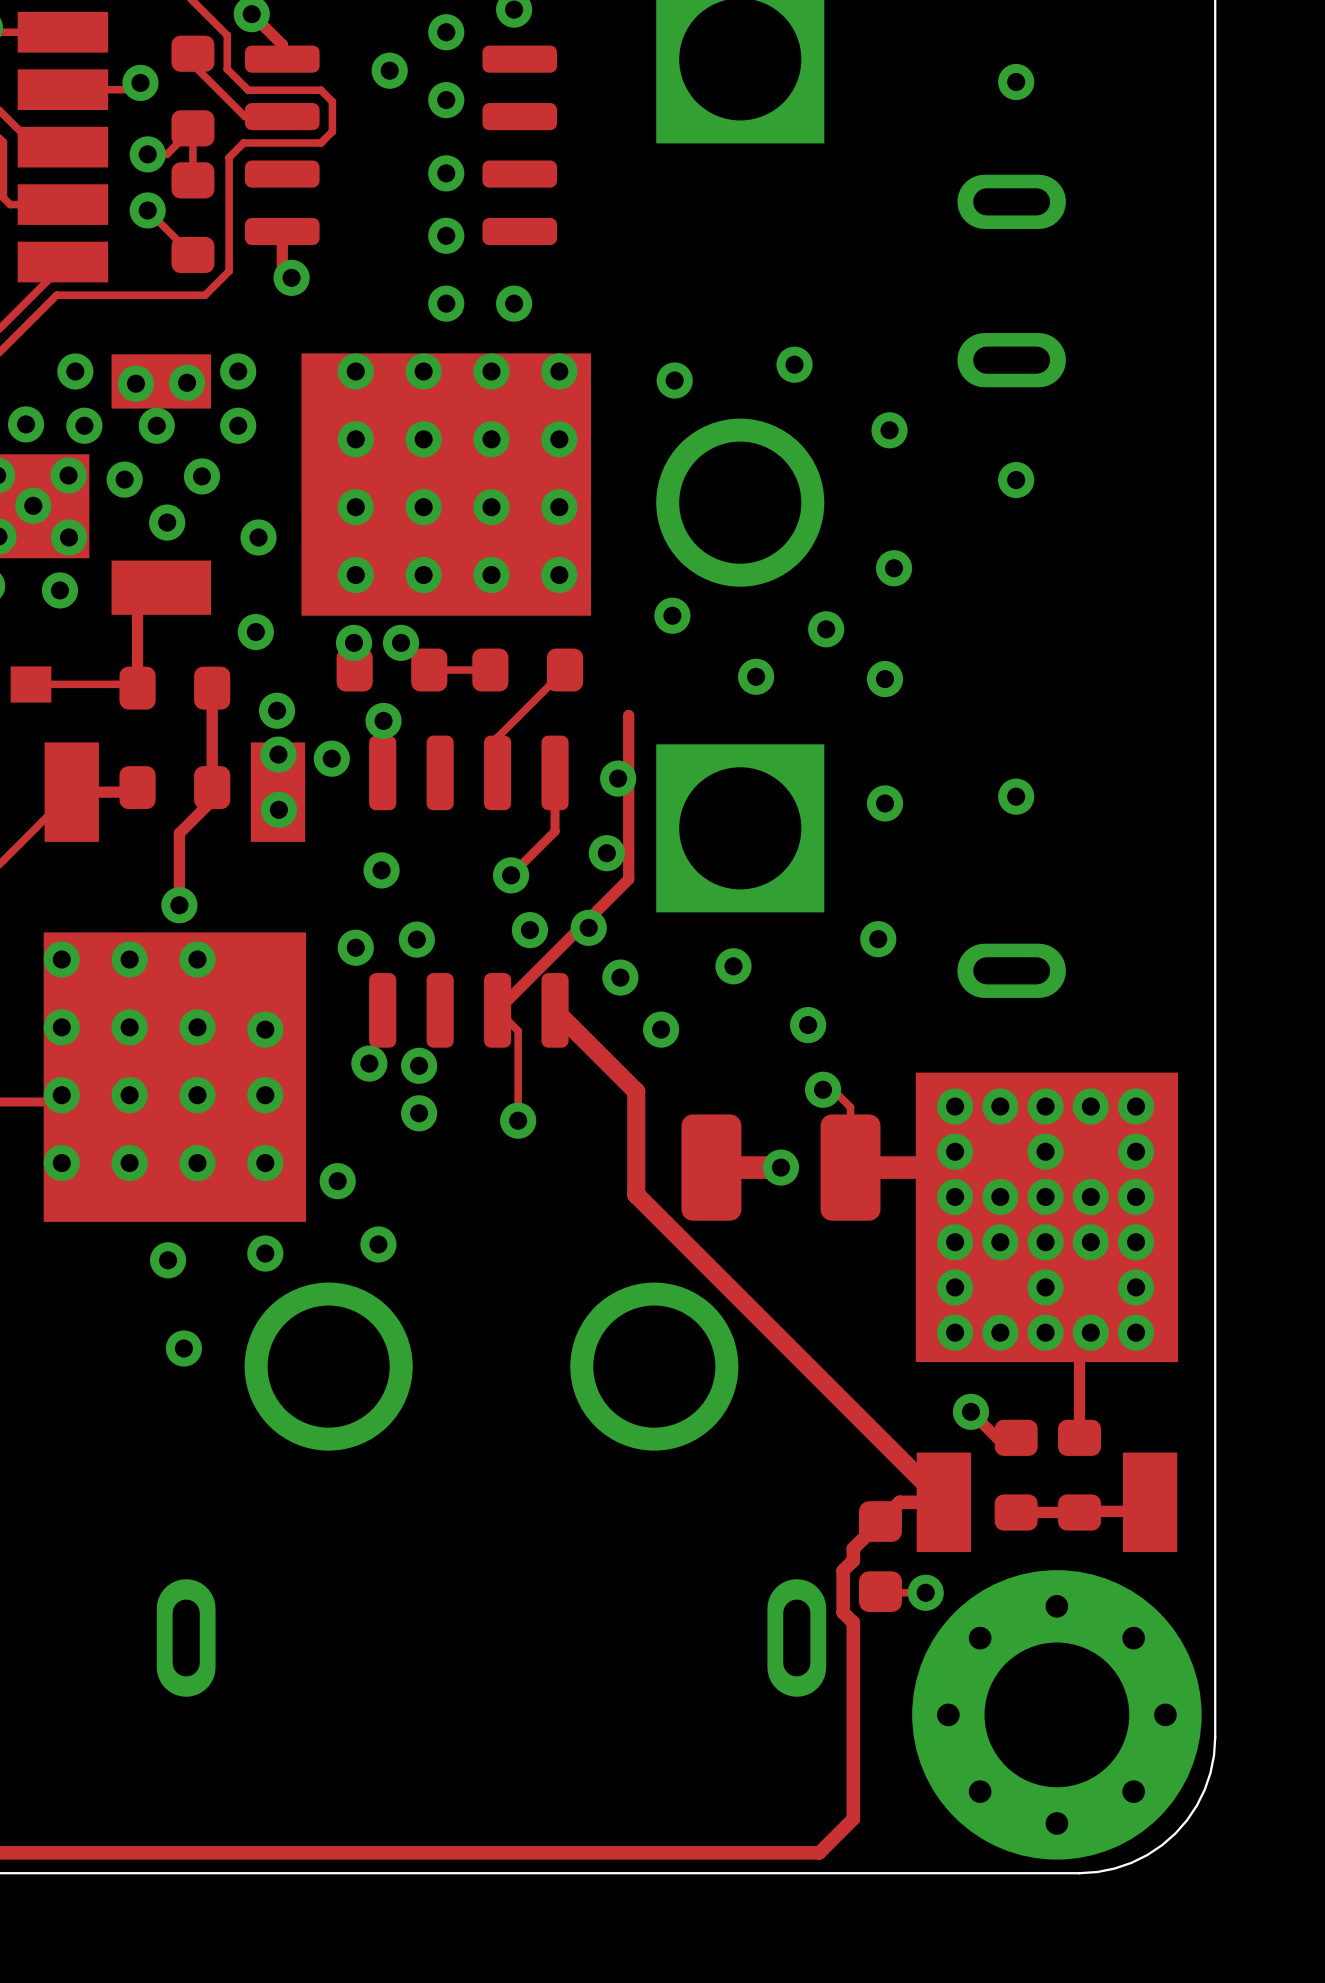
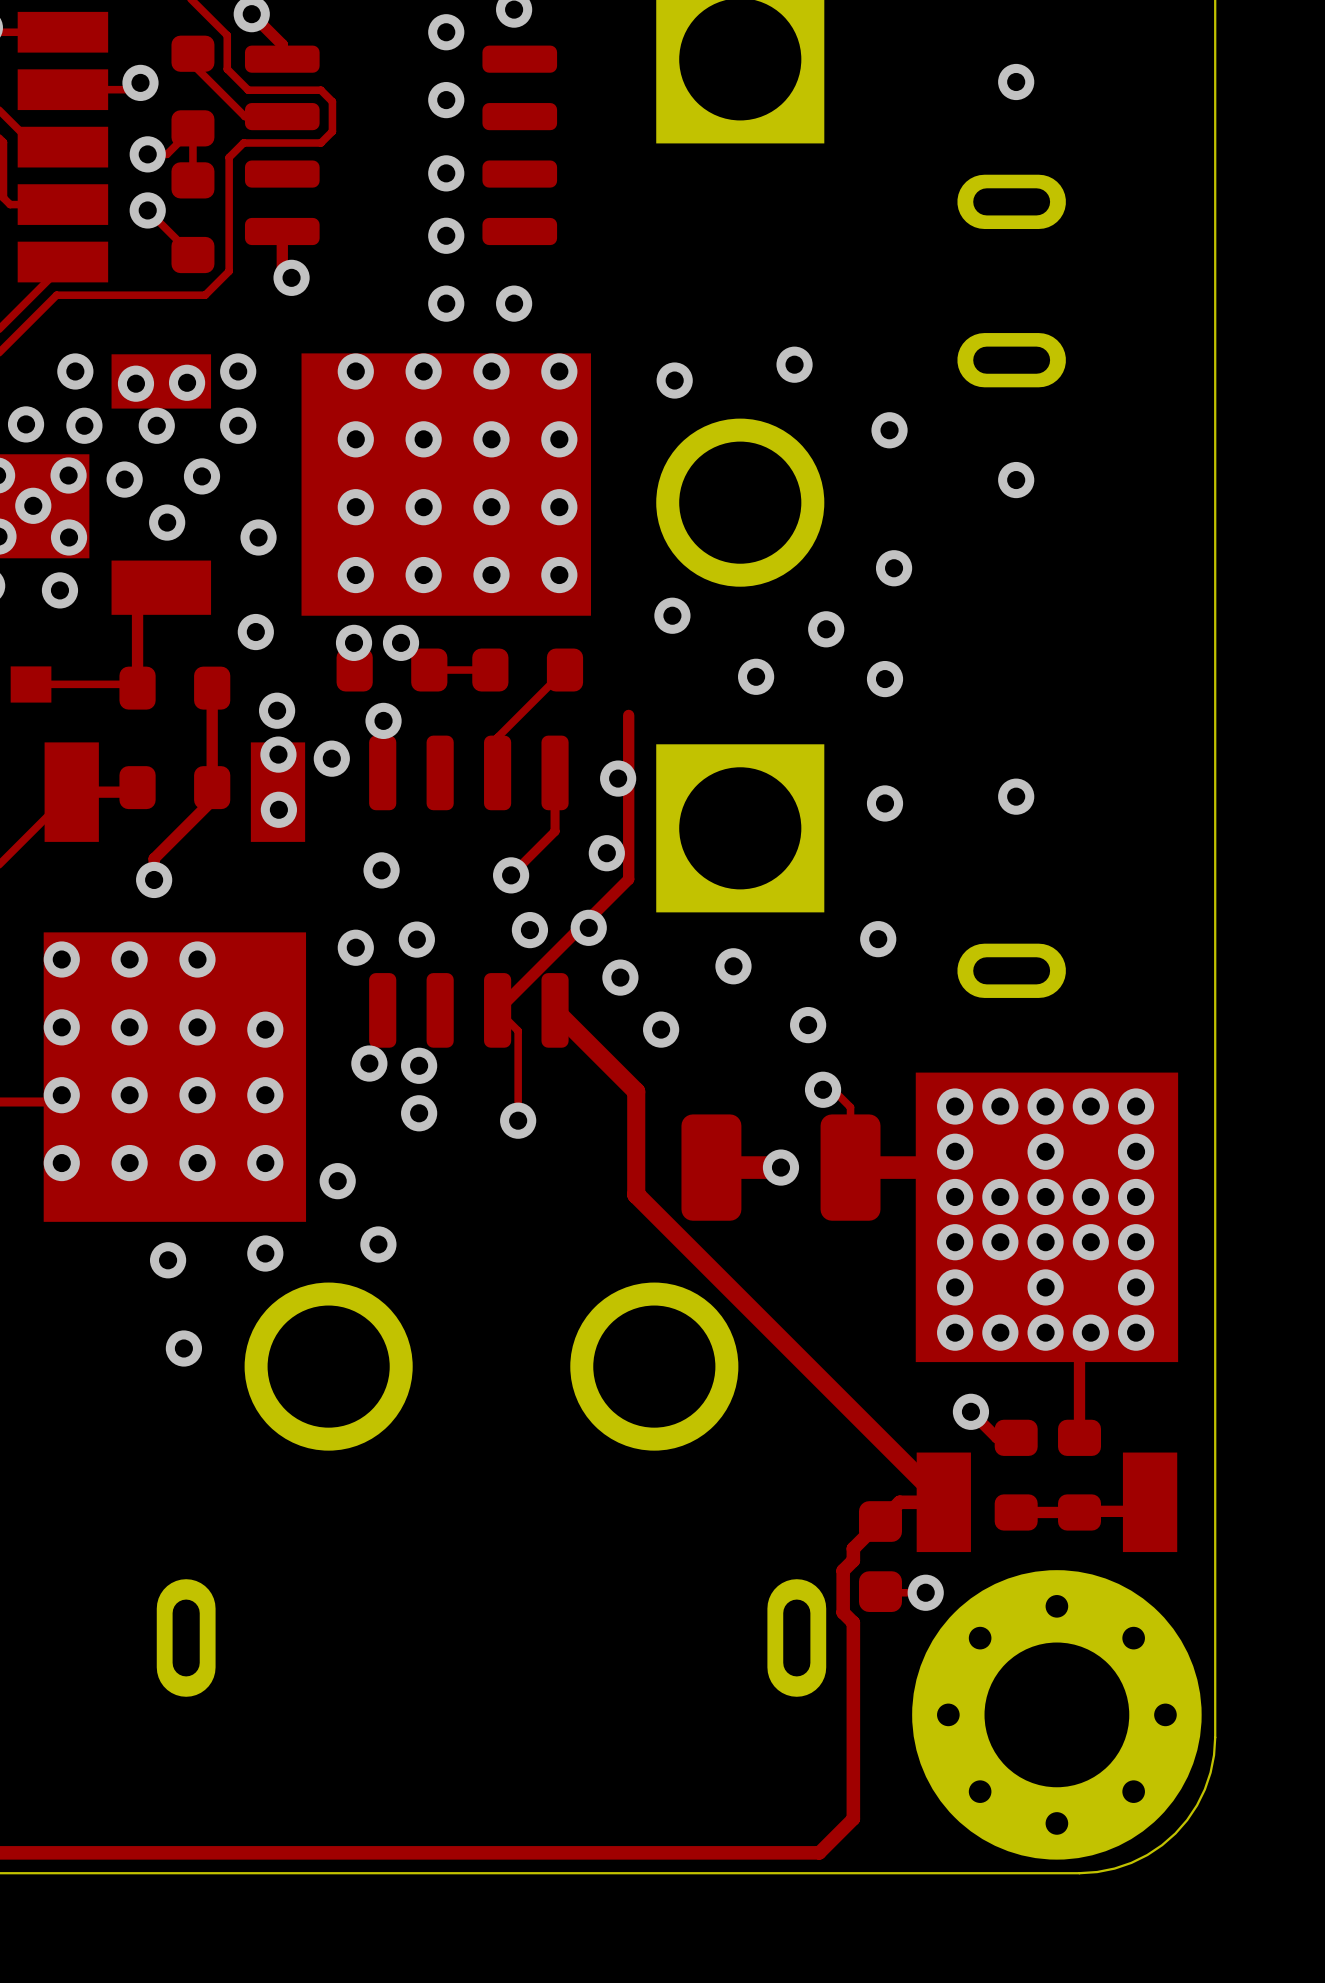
via: (389, 70) -> none
top track: (179, 833) (179, 905) -> (179, 833) (154, 858) (154, 879)
via position: (179, 905) -> (154, 879)

